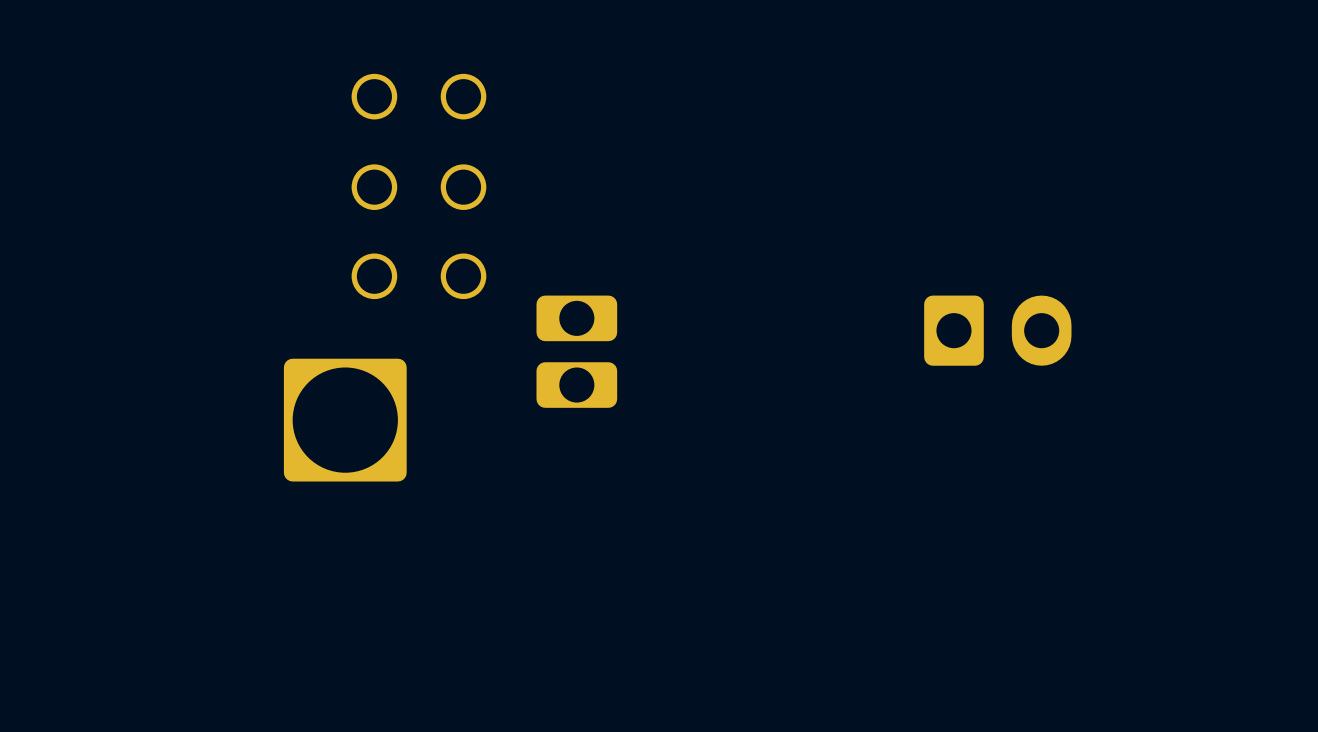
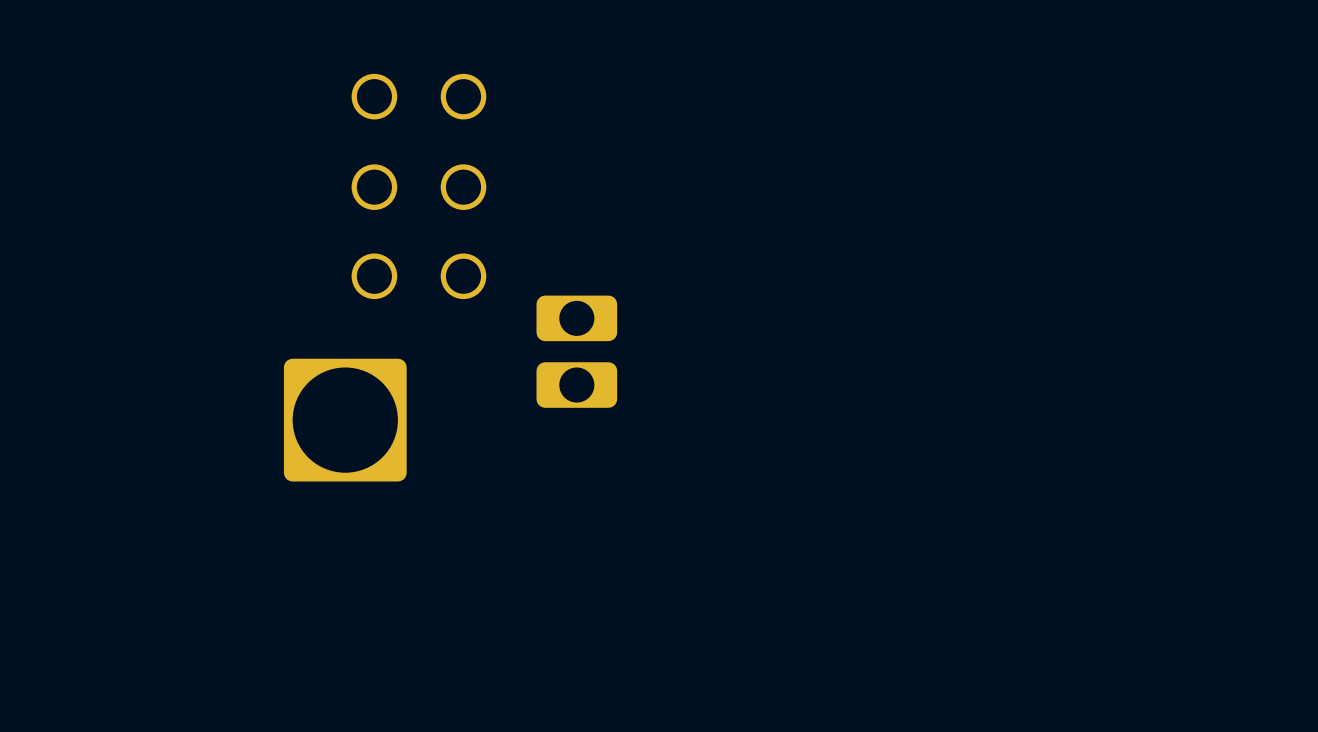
part: (997, 330) -> none

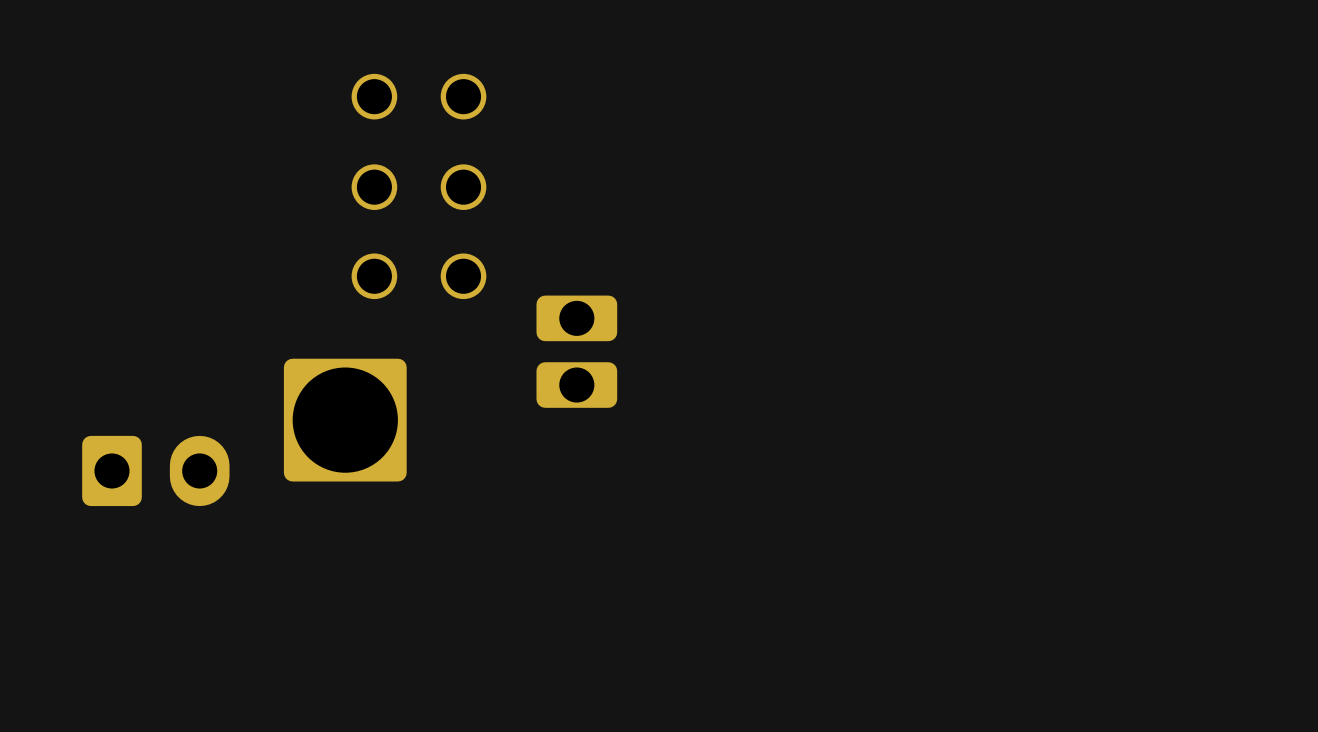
part: none -> (155, 470)

